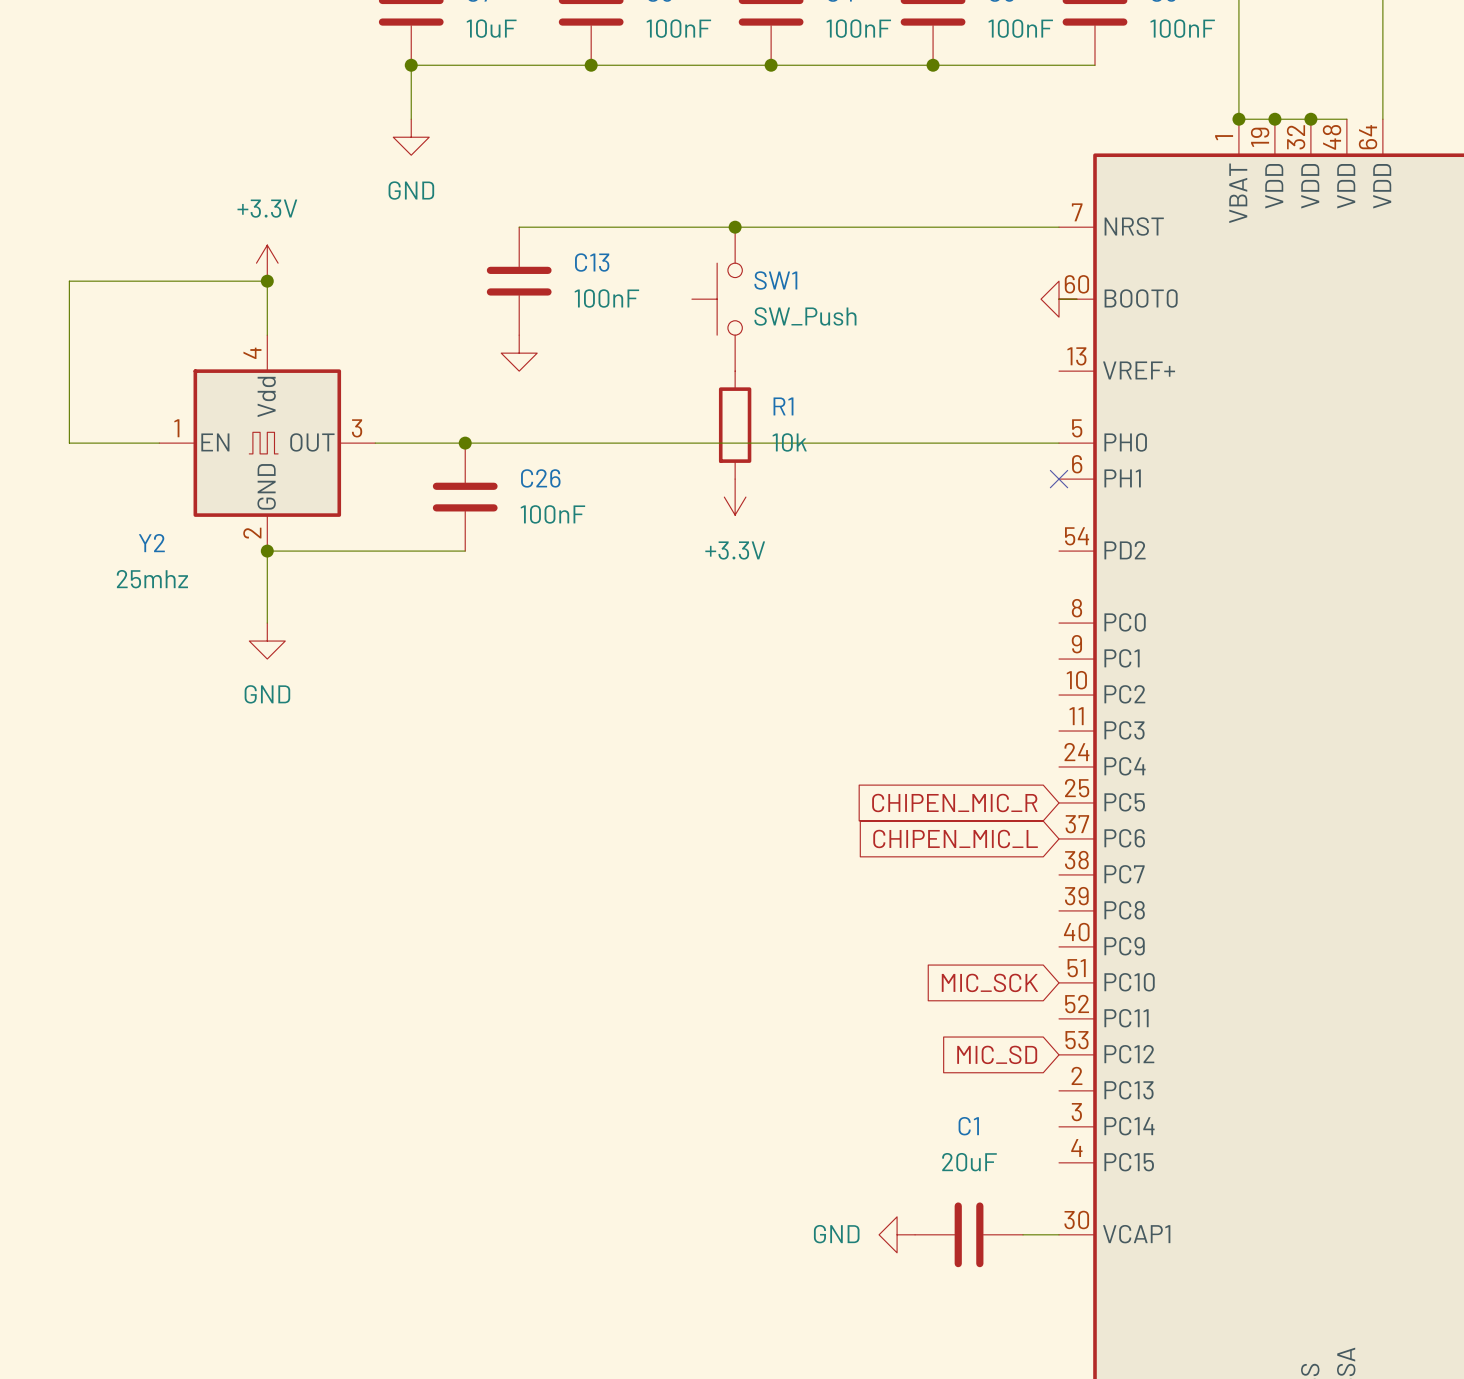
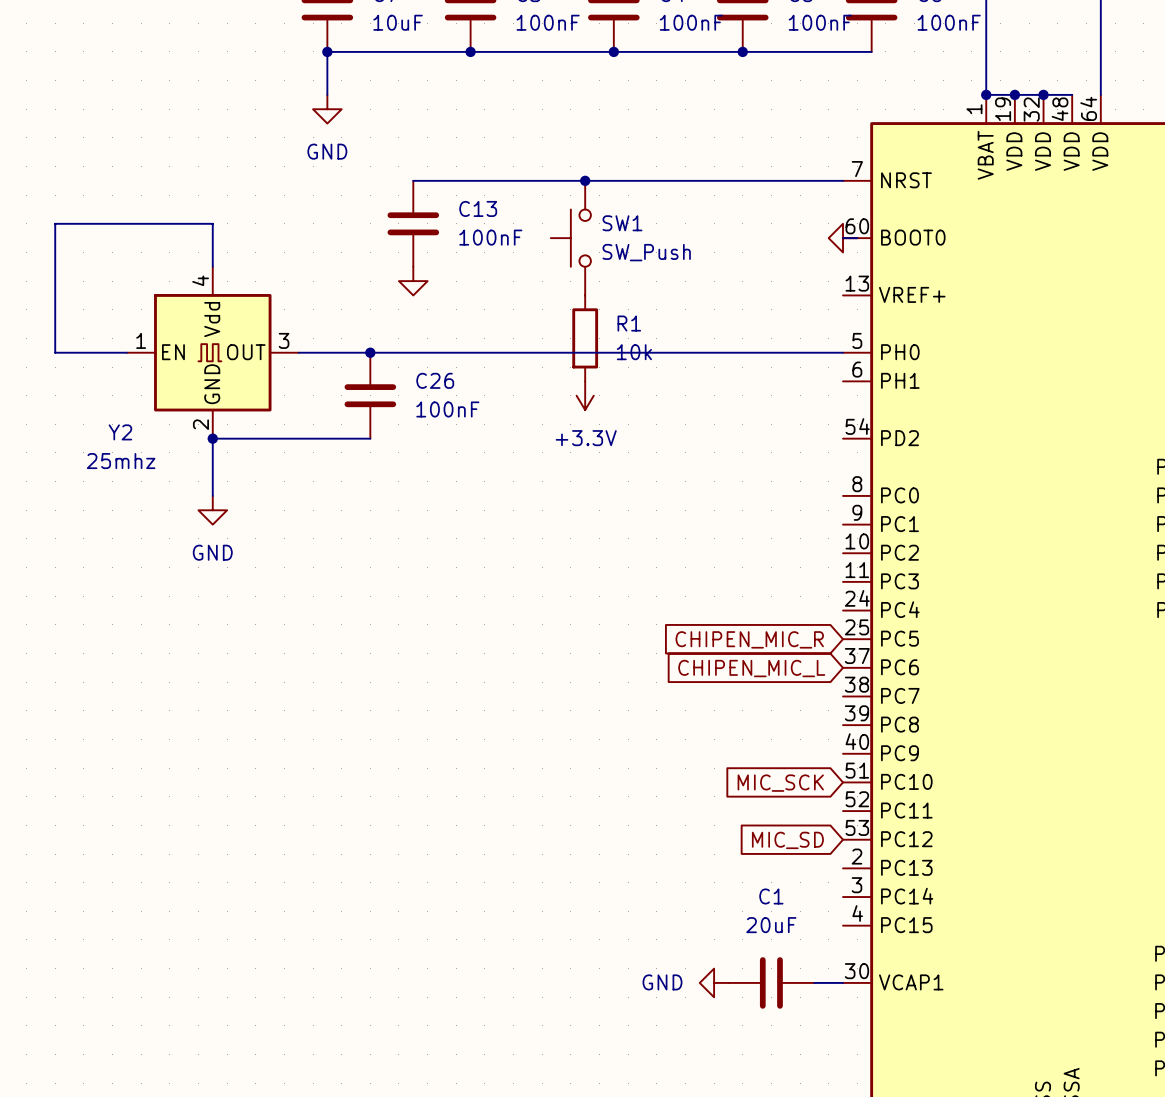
power symbol: +3.3V (267, 263) -> none
junction: (267, 281) -> none
no-connect mark: (1059, 479) -> none

